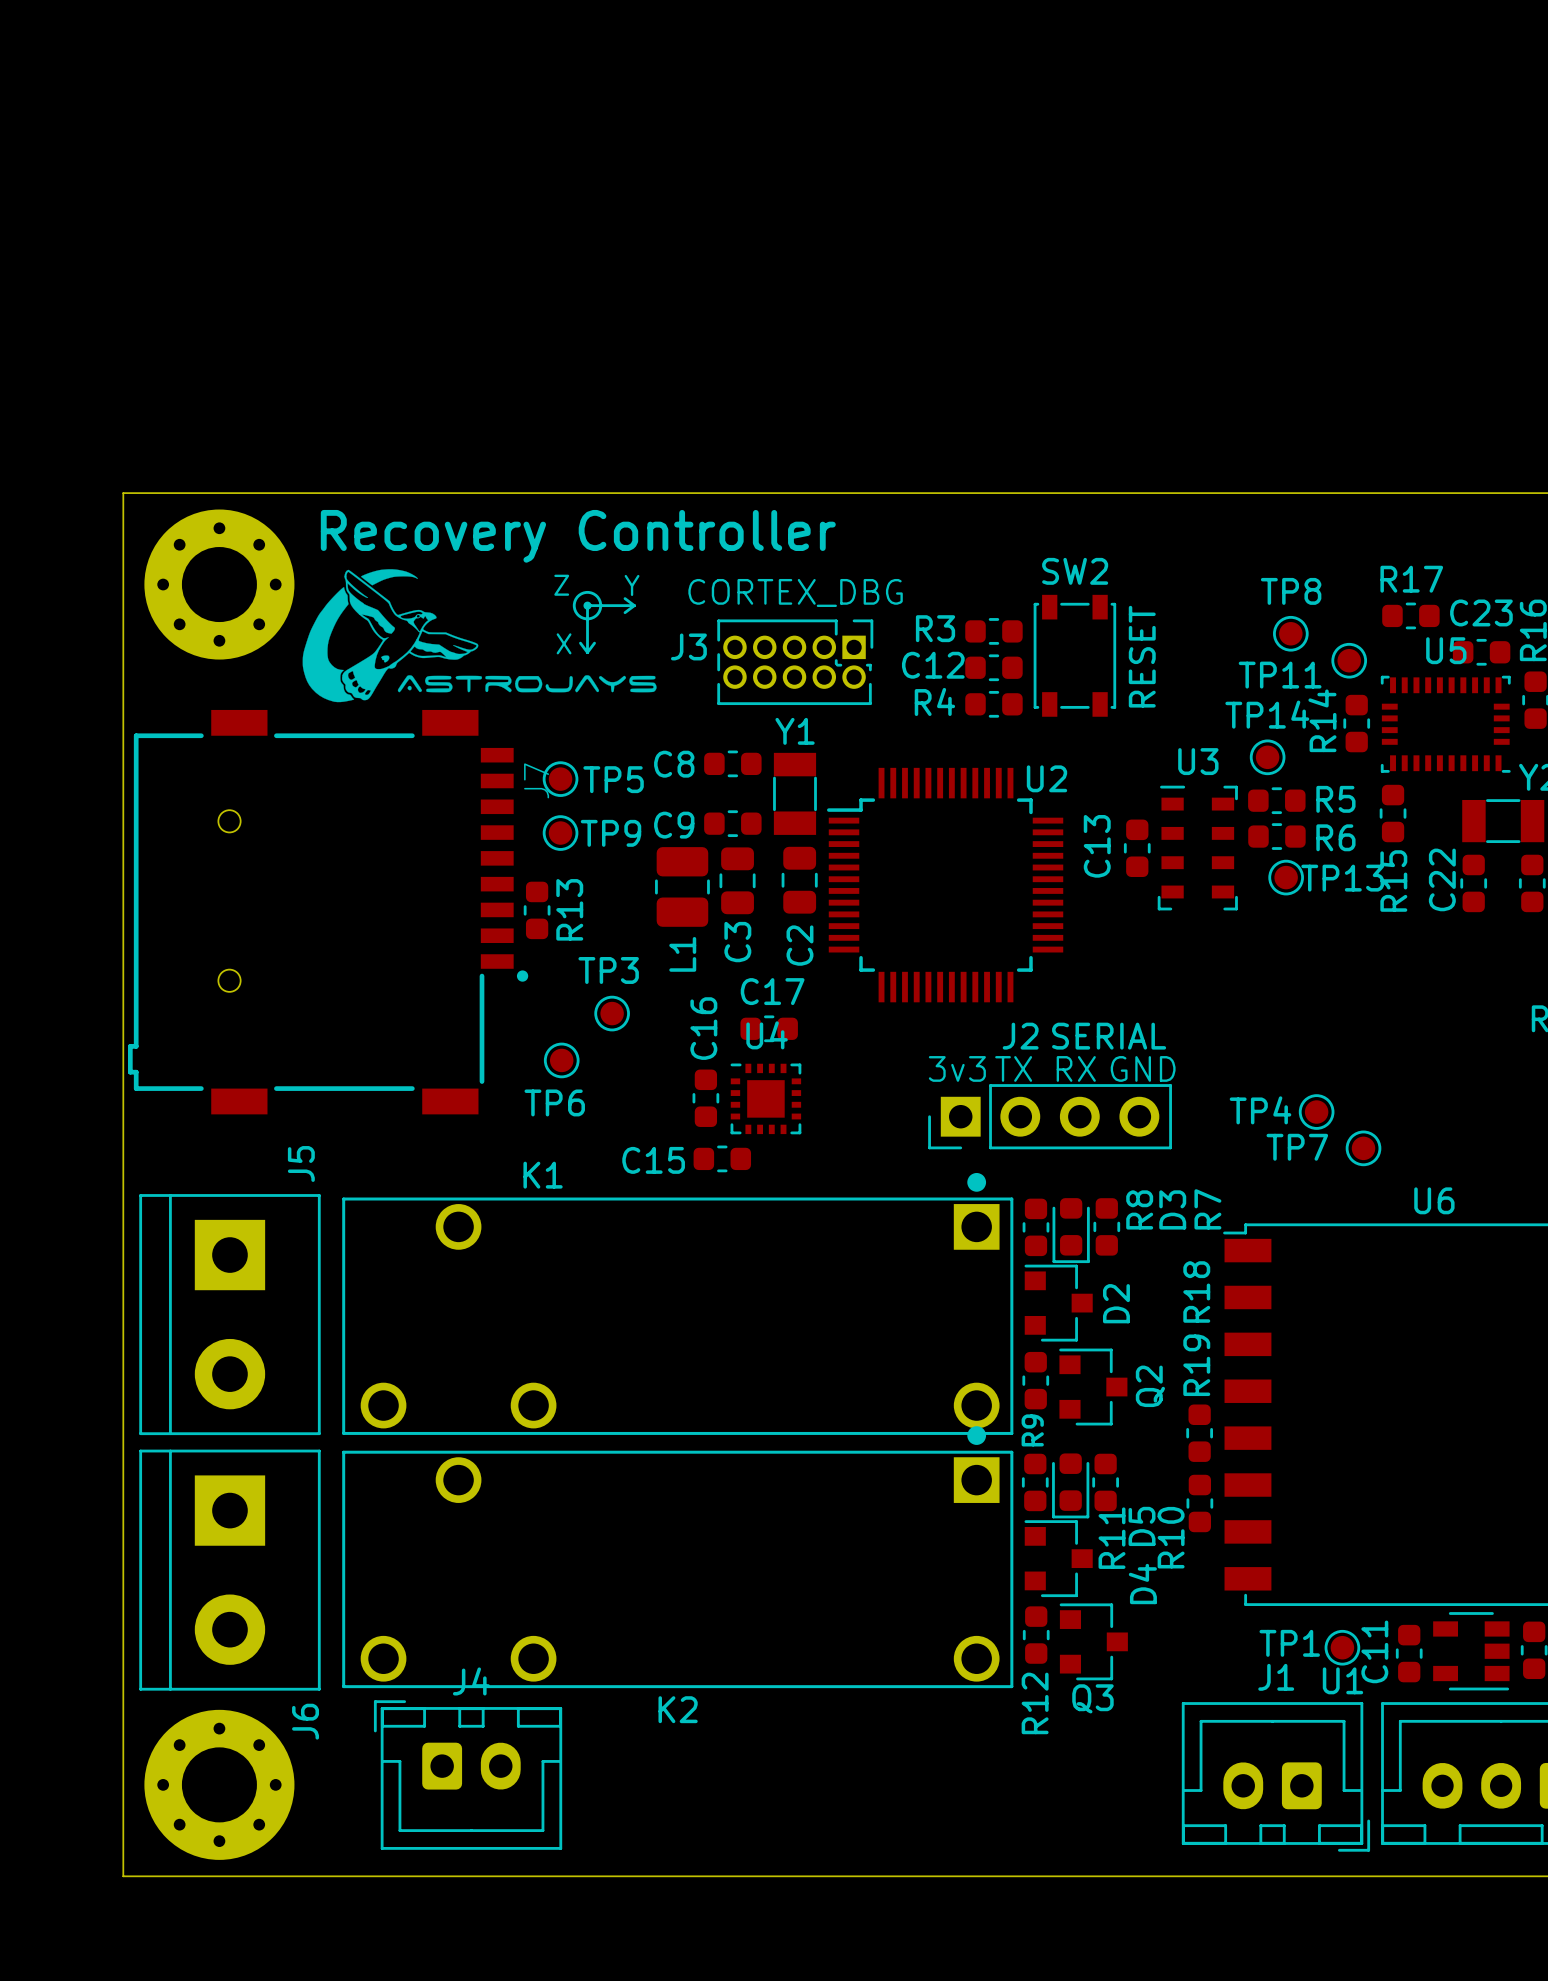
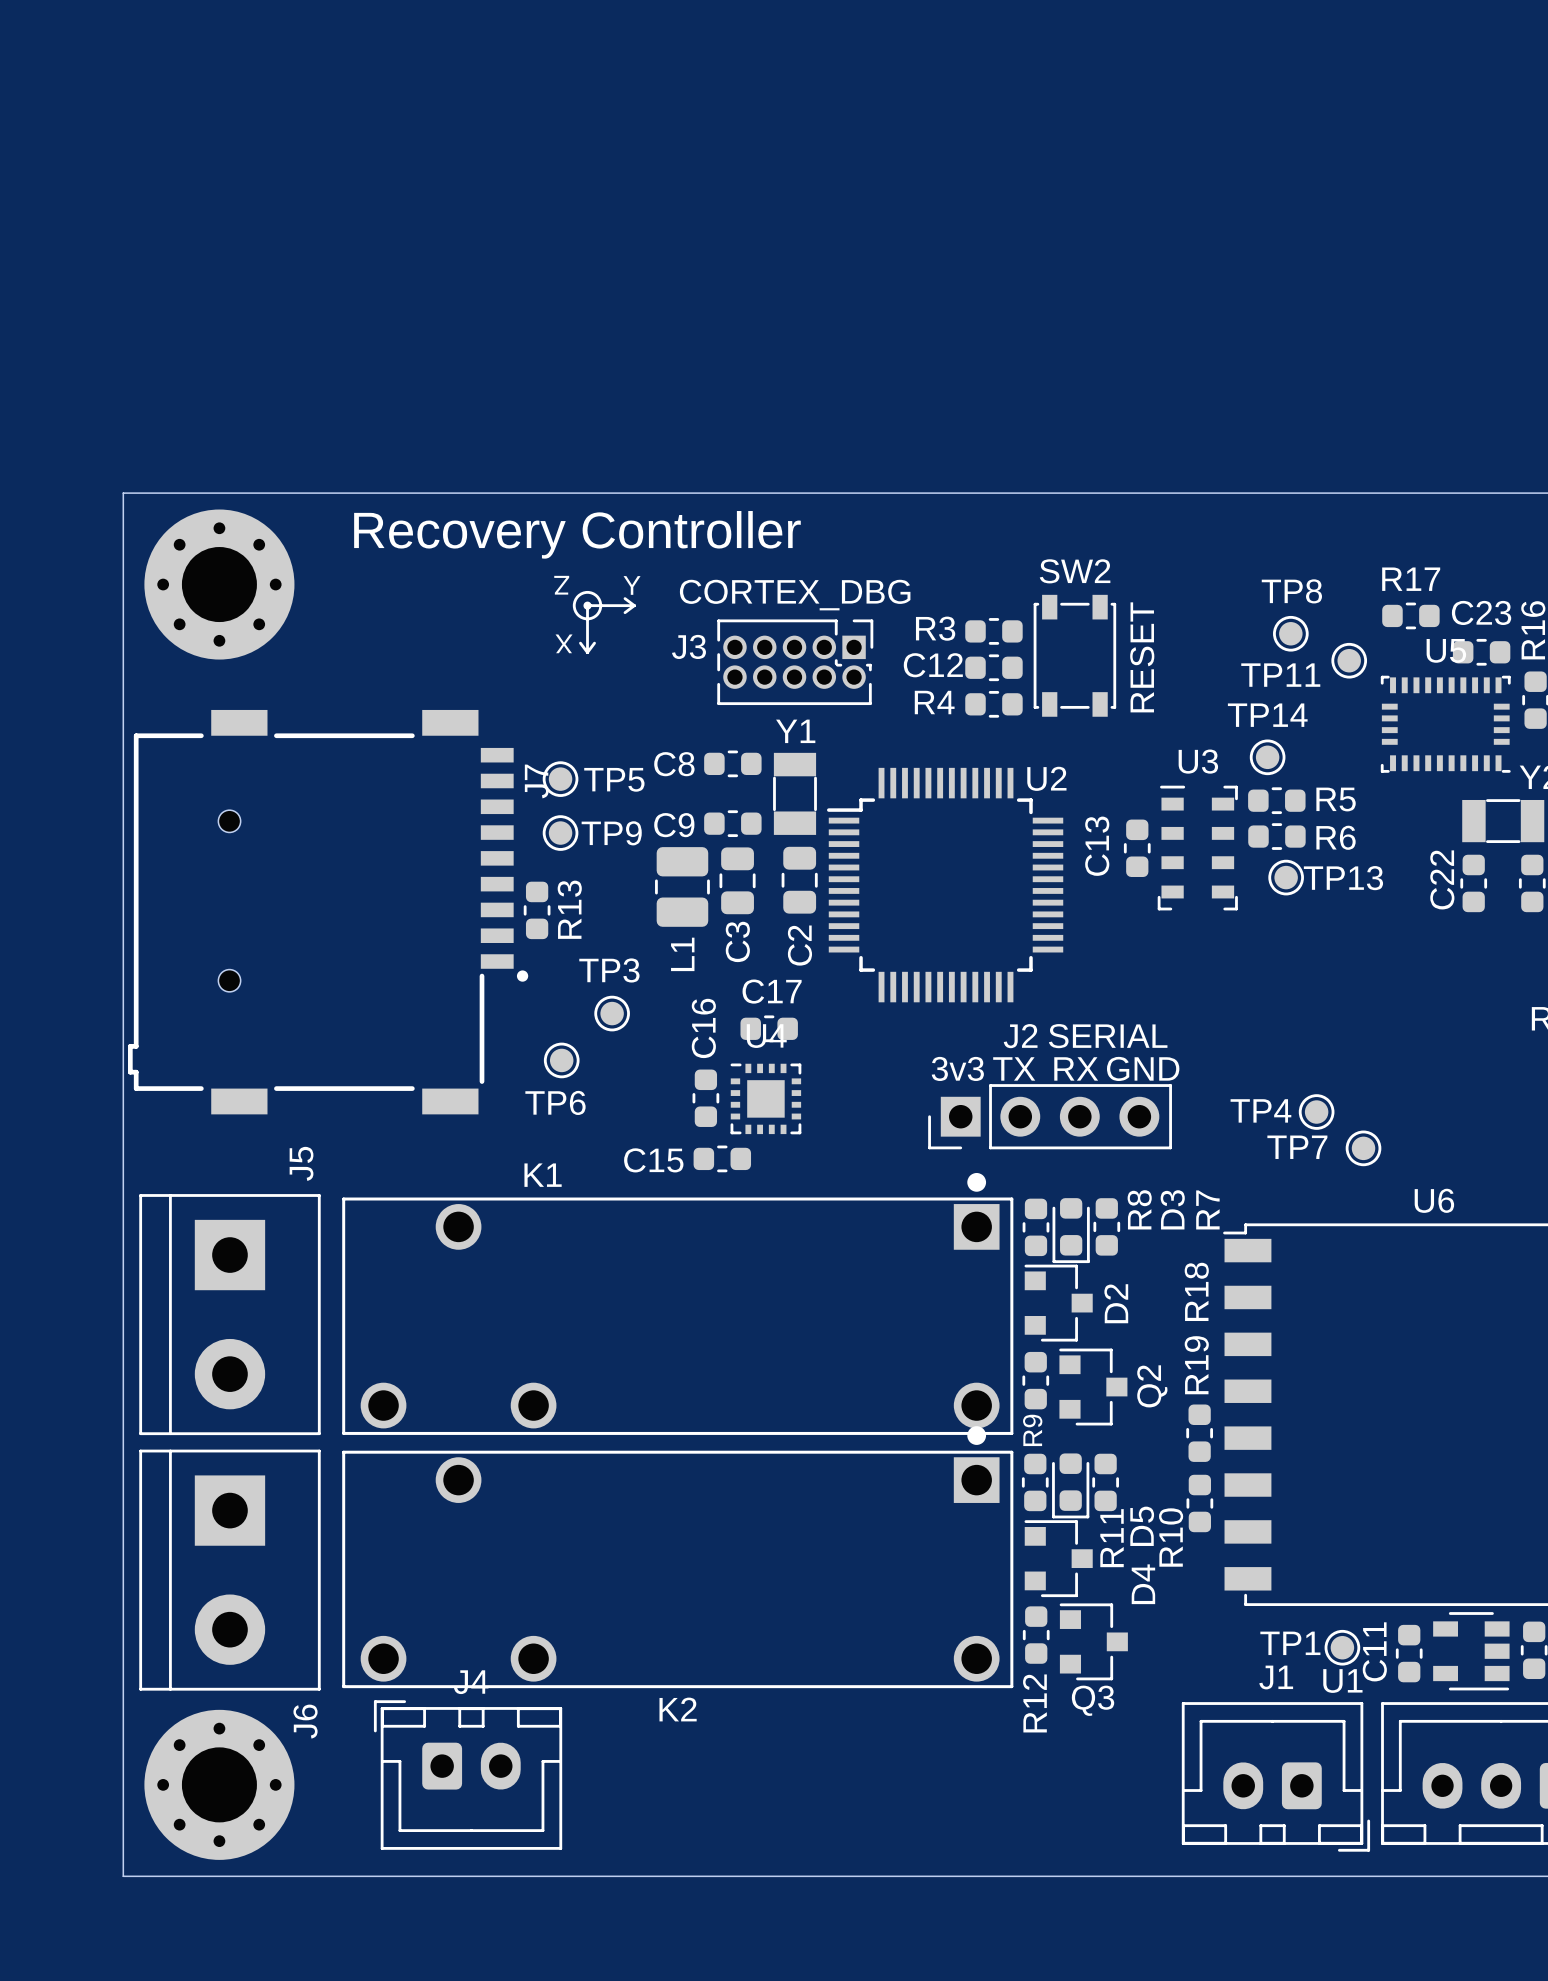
drawing: [302, 569, 657, 703] -> none
R14: (1356, 723) -> none
R15: (1393, 813) -> none

